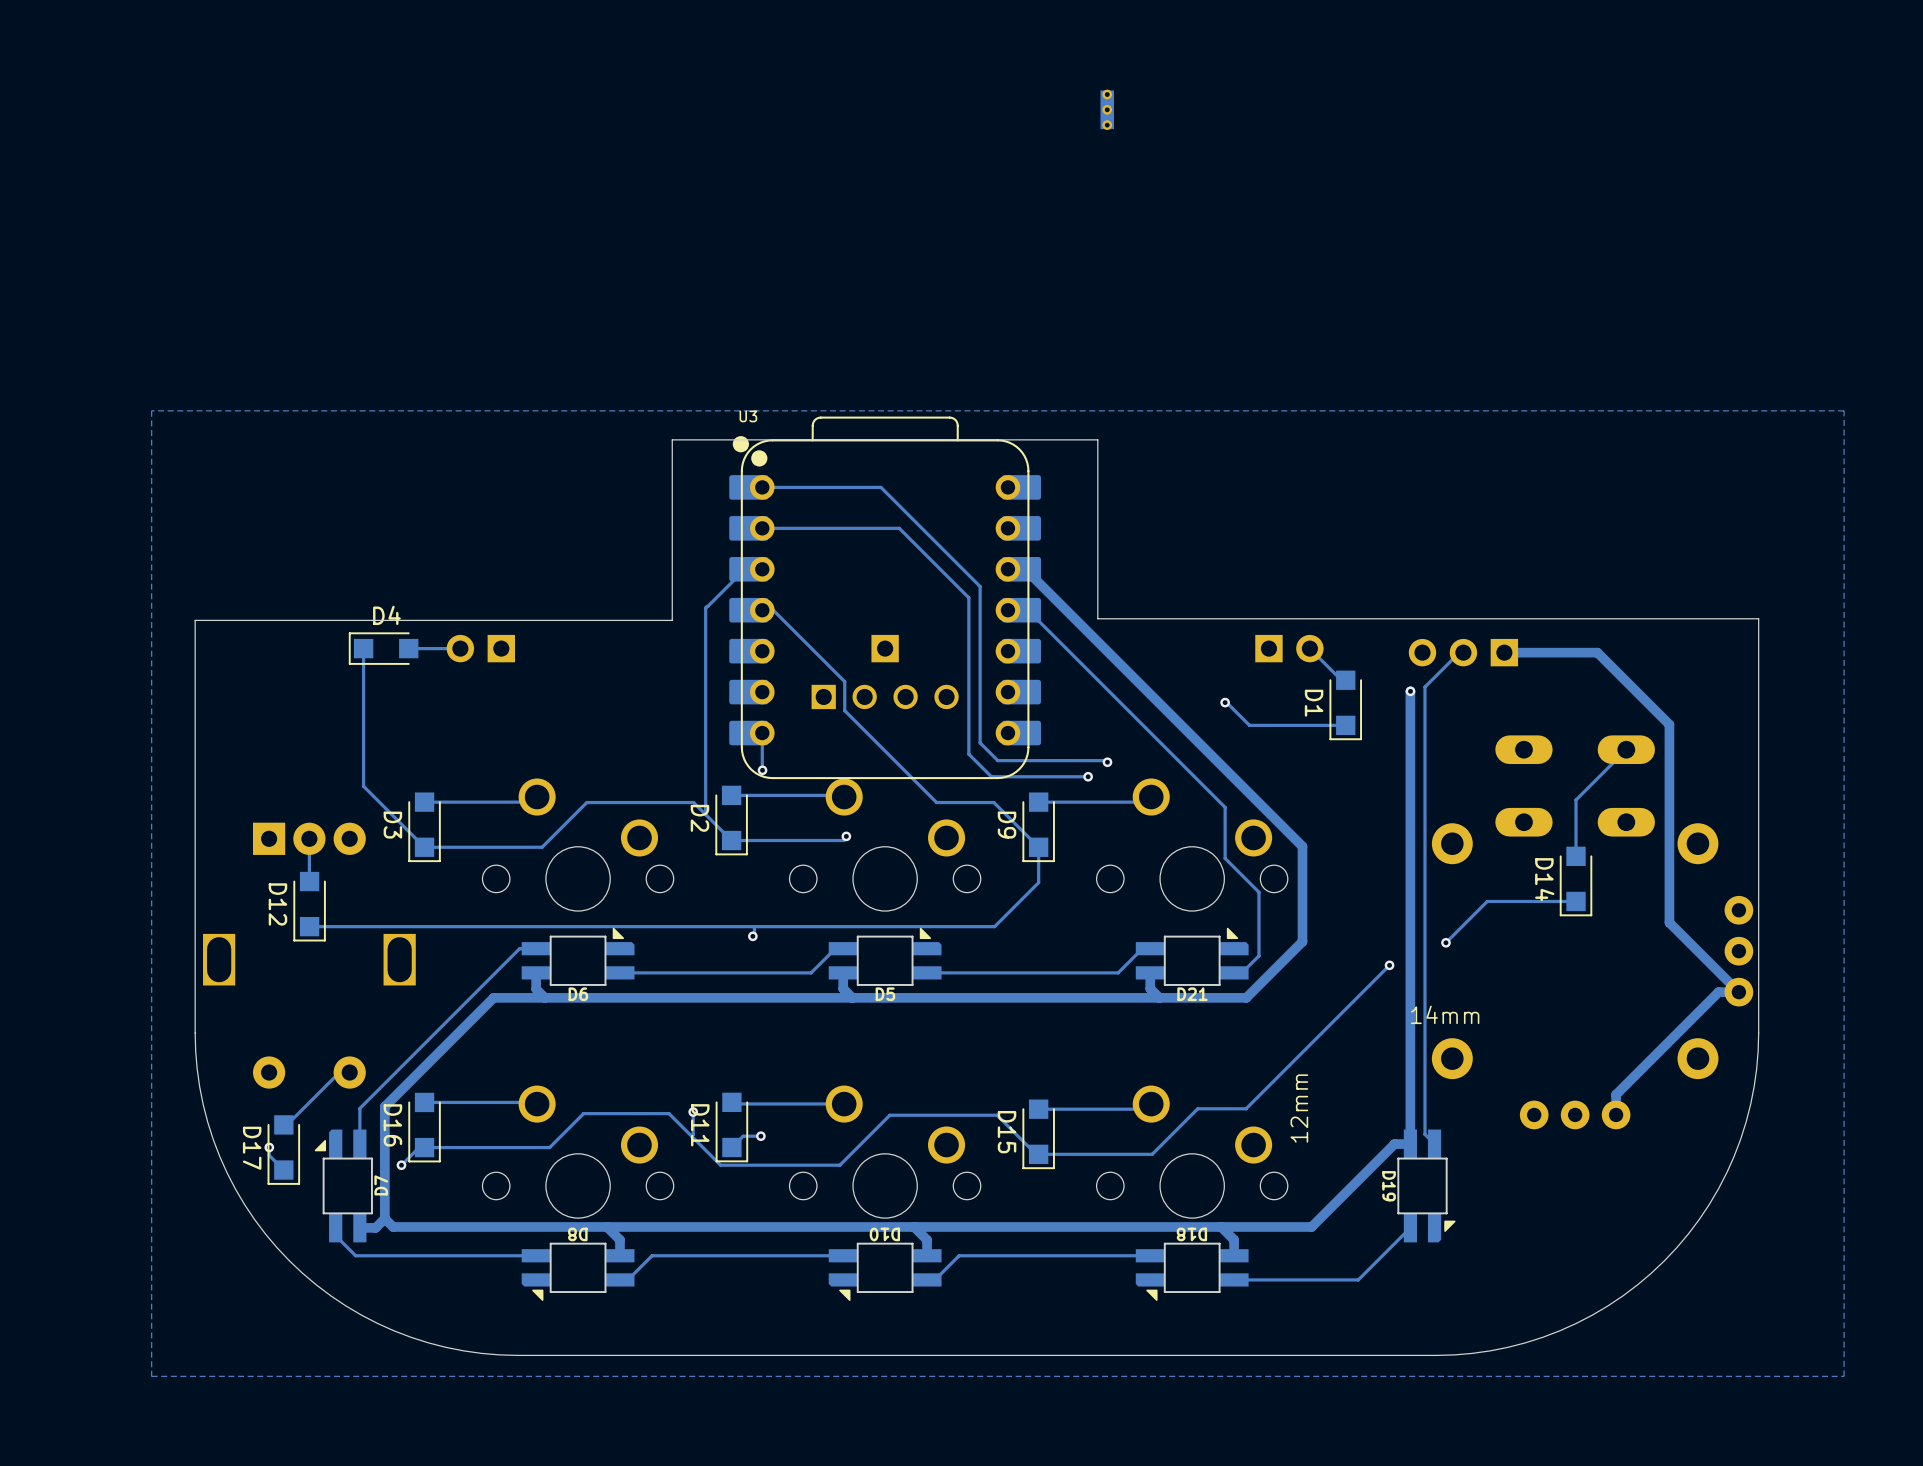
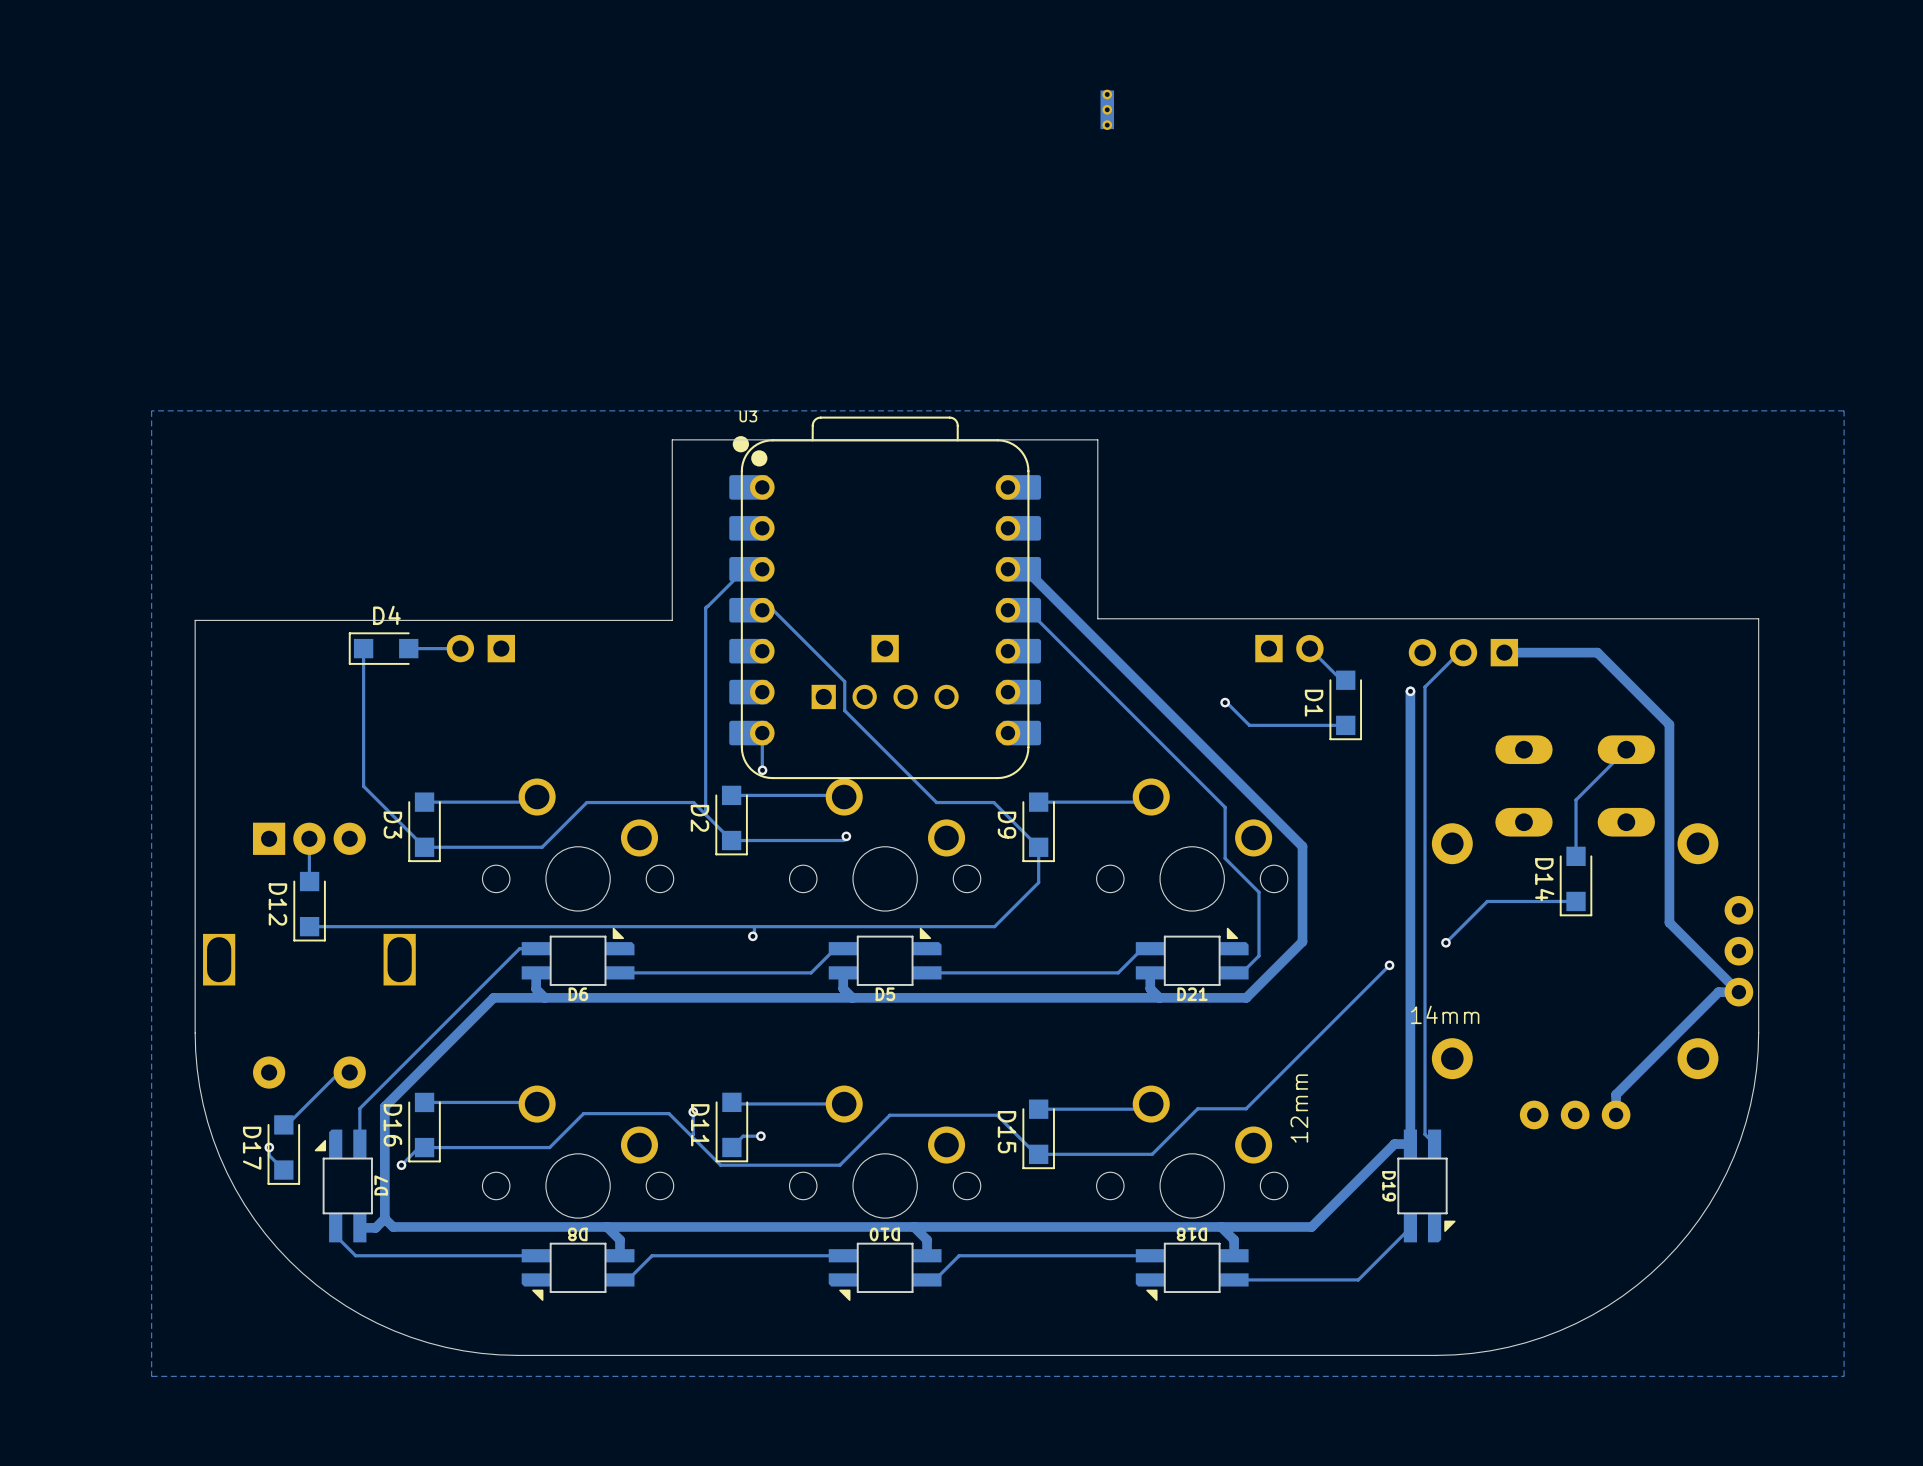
track: (762, 487) (880, 487) (980, 586) (980, 742) (997, 760) (1105, 760) (1107, 762) -> none
track: (762, 528) (899, 528) (968, 597) (968, 754) (991, 776) (1088, 776) -> none
via: (1107, 762) -> none
via: (1088, 776) -> none

